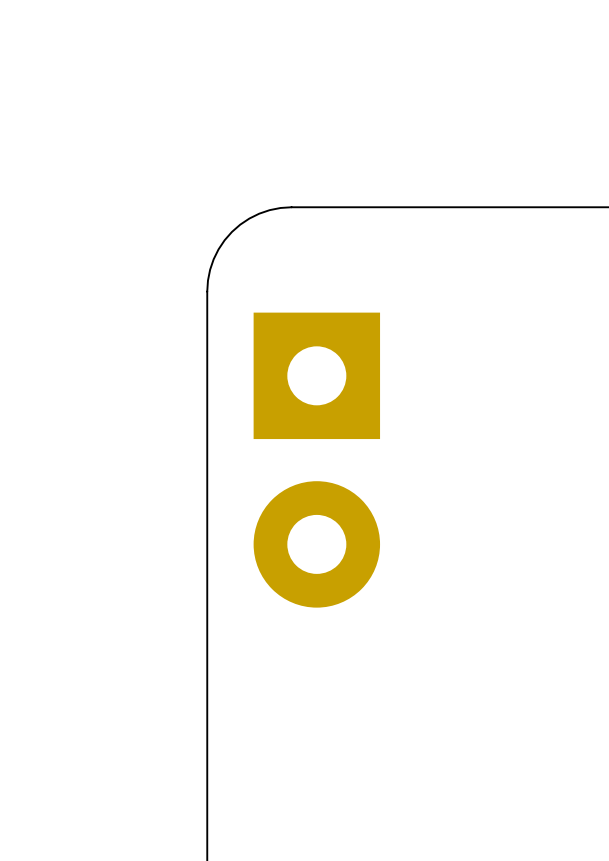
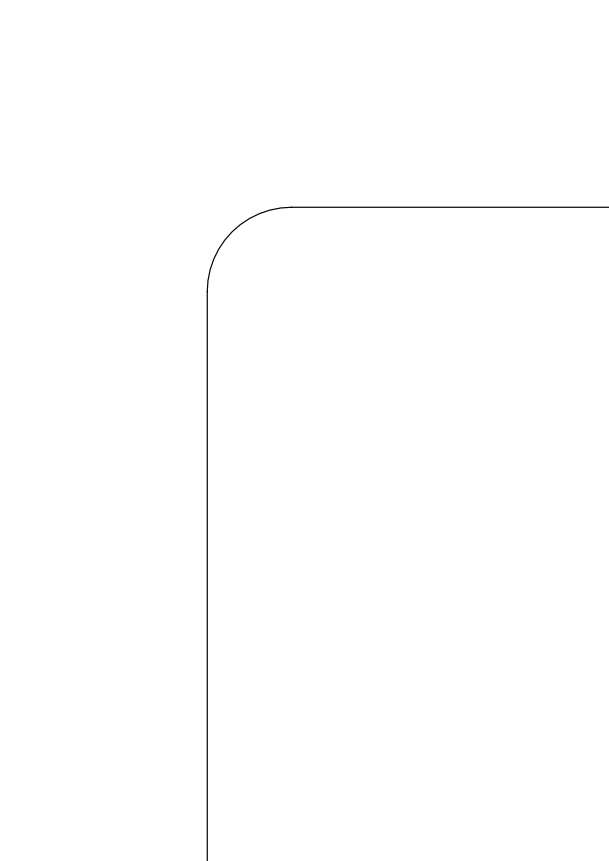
part: (316, 460) -> none

